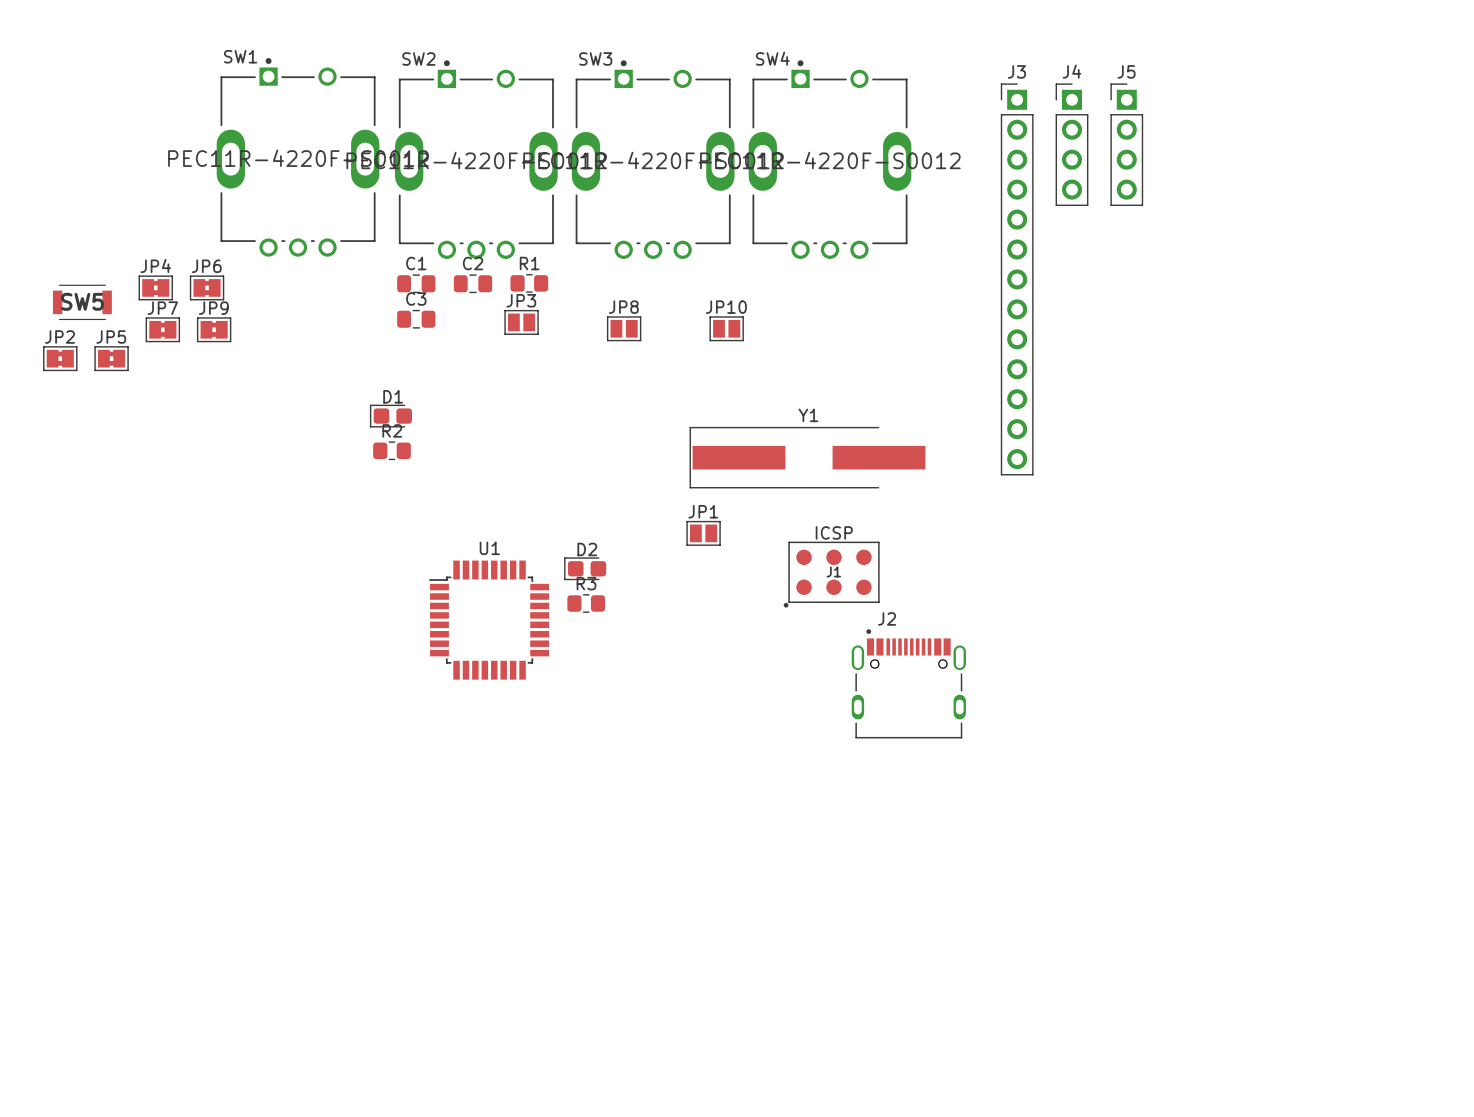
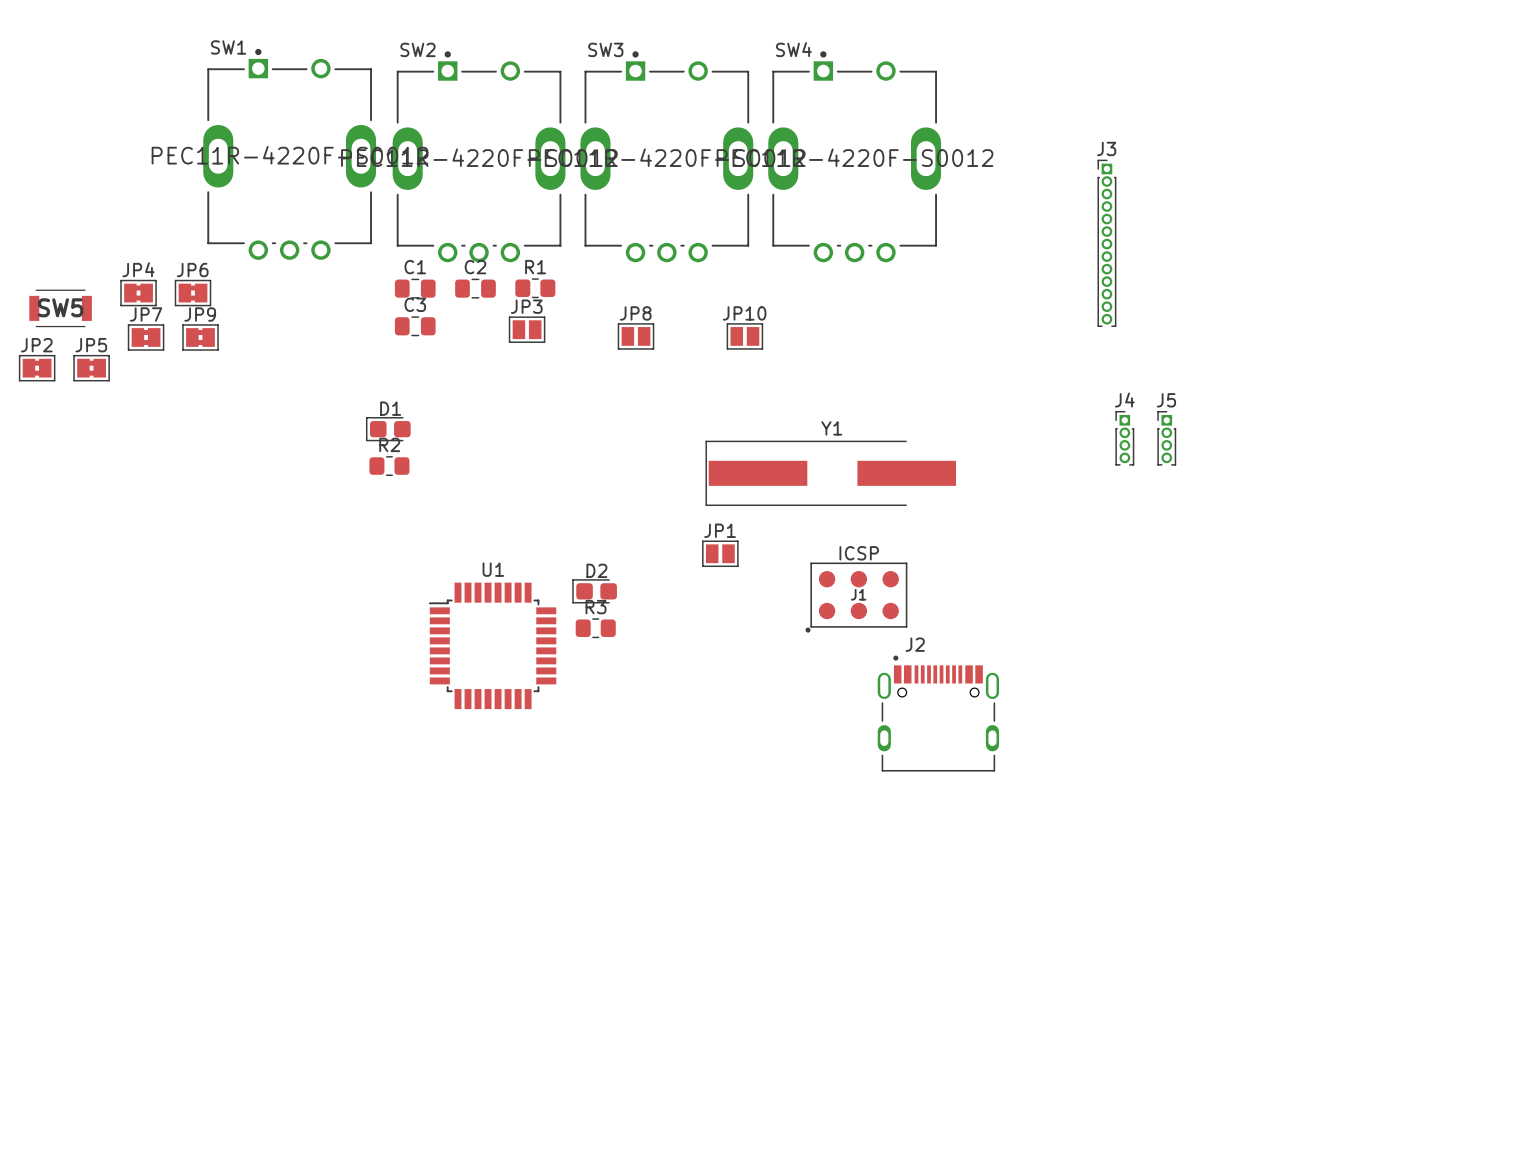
J3 name position: J3 (1016, 71) -> J3 (1106, 148)
J4 name position: J4 (1071, 71) -> J4 (1124, 400)
J5 name position: J5 (1126, 71) -> J5 (1166, 400)
J3 footprint: [1000, 83, 1034, 476] -> [1097, 159, 1117, 327]
J4 footprint: [1055, 83, 1089, 207] -> [1115, 410, 1135, 466]
J5 footprint: [1110, 83, 1144, 207] -> [1157, 410, 1177, 466]

